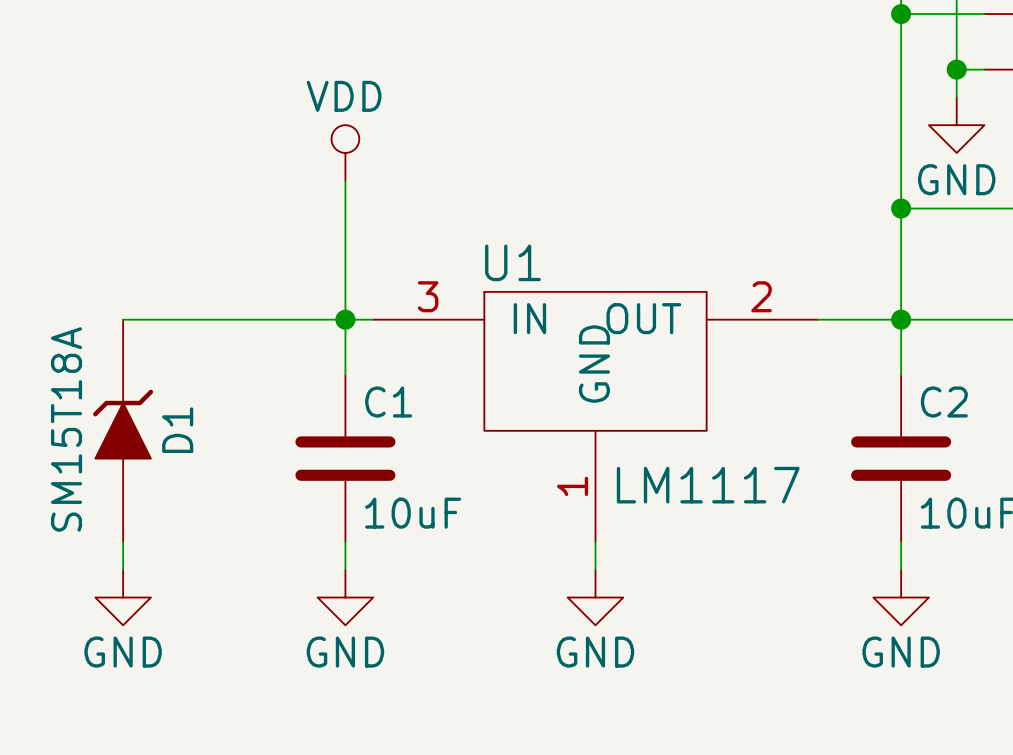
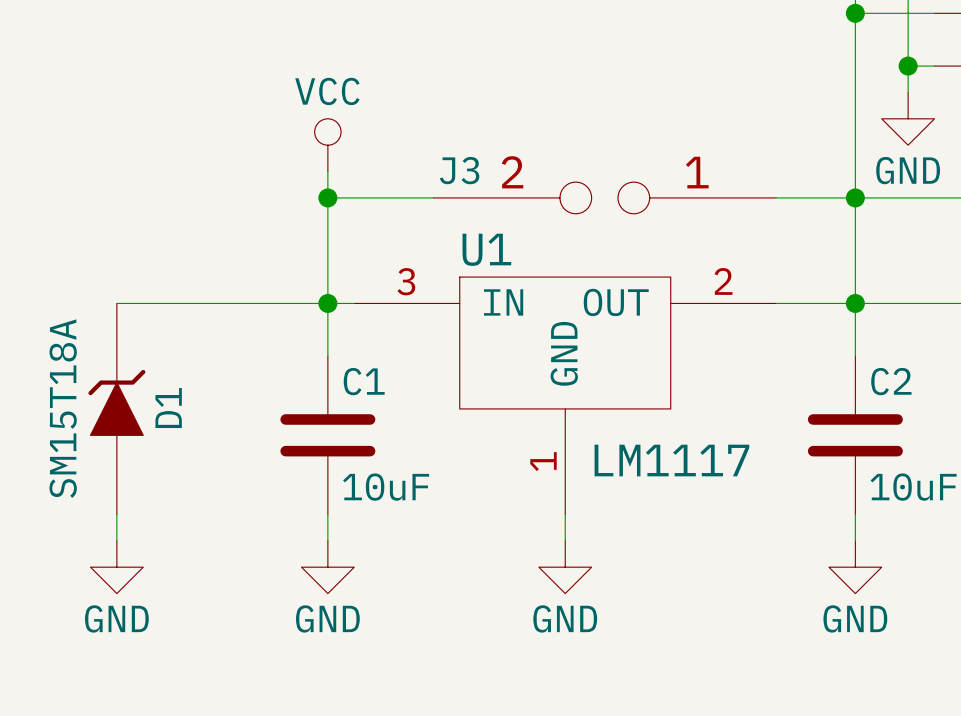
power symbol: VDD (345, 152) -> VCC (327, 145)
wire: none -> (327, 197) (433, 197)
junction: none -> (327, 197)
J3: none -> (604, 197)
wire: none -> (776, 197) (855, 197)

